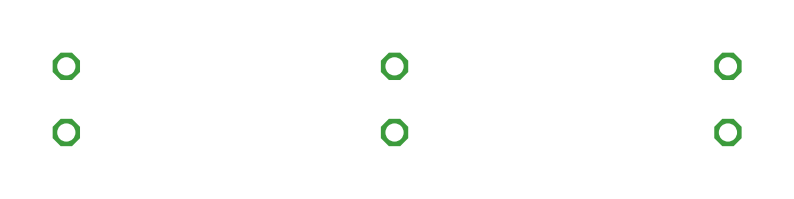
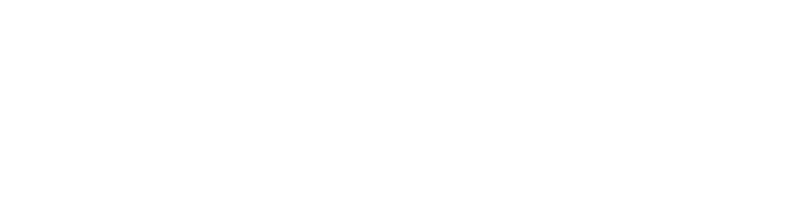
part: (66, 99) -> none
part: (394, 99) -> none
part: (727, 99) -> none

